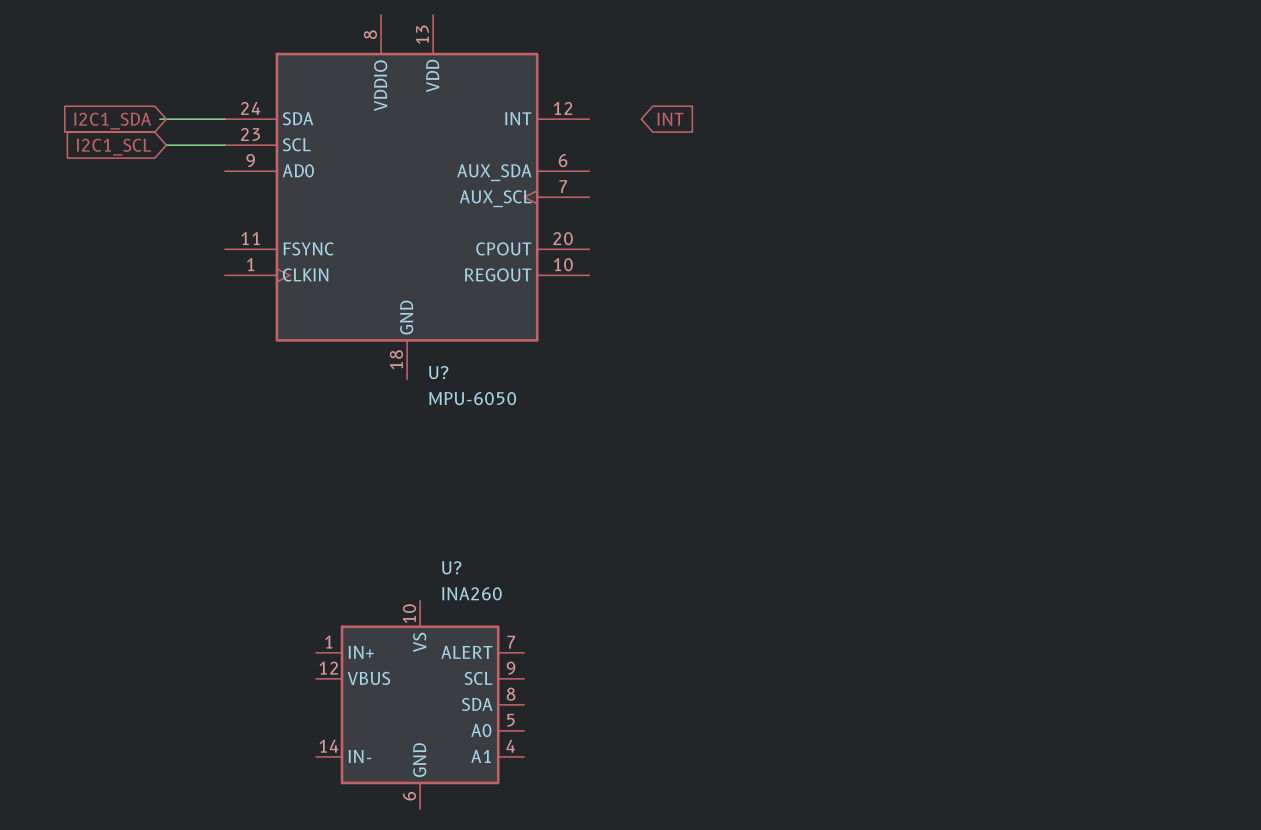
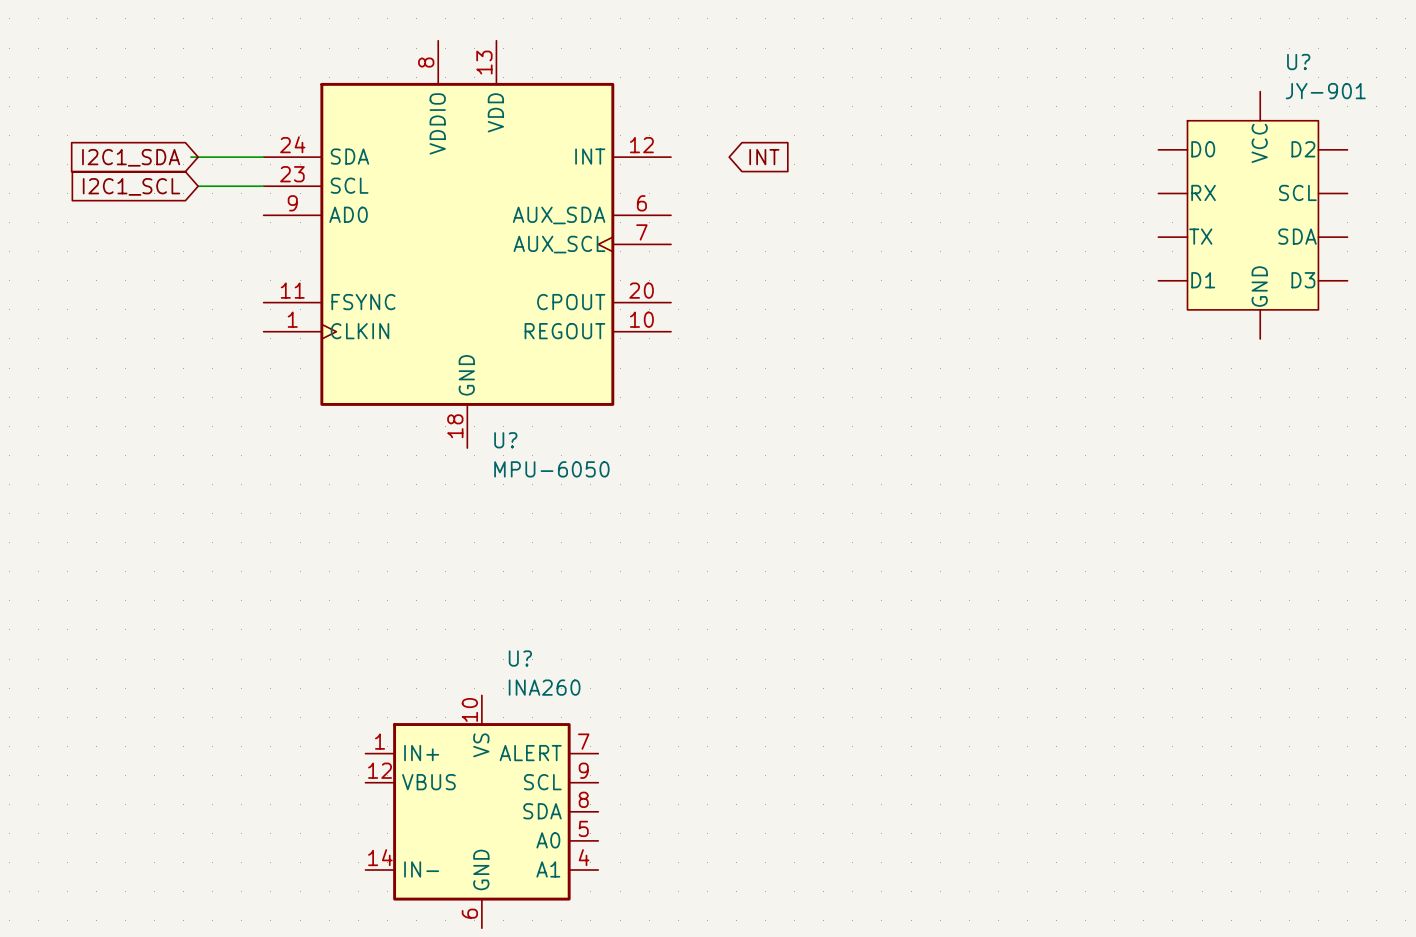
U?: none -> JY-901 (1223, 215)

